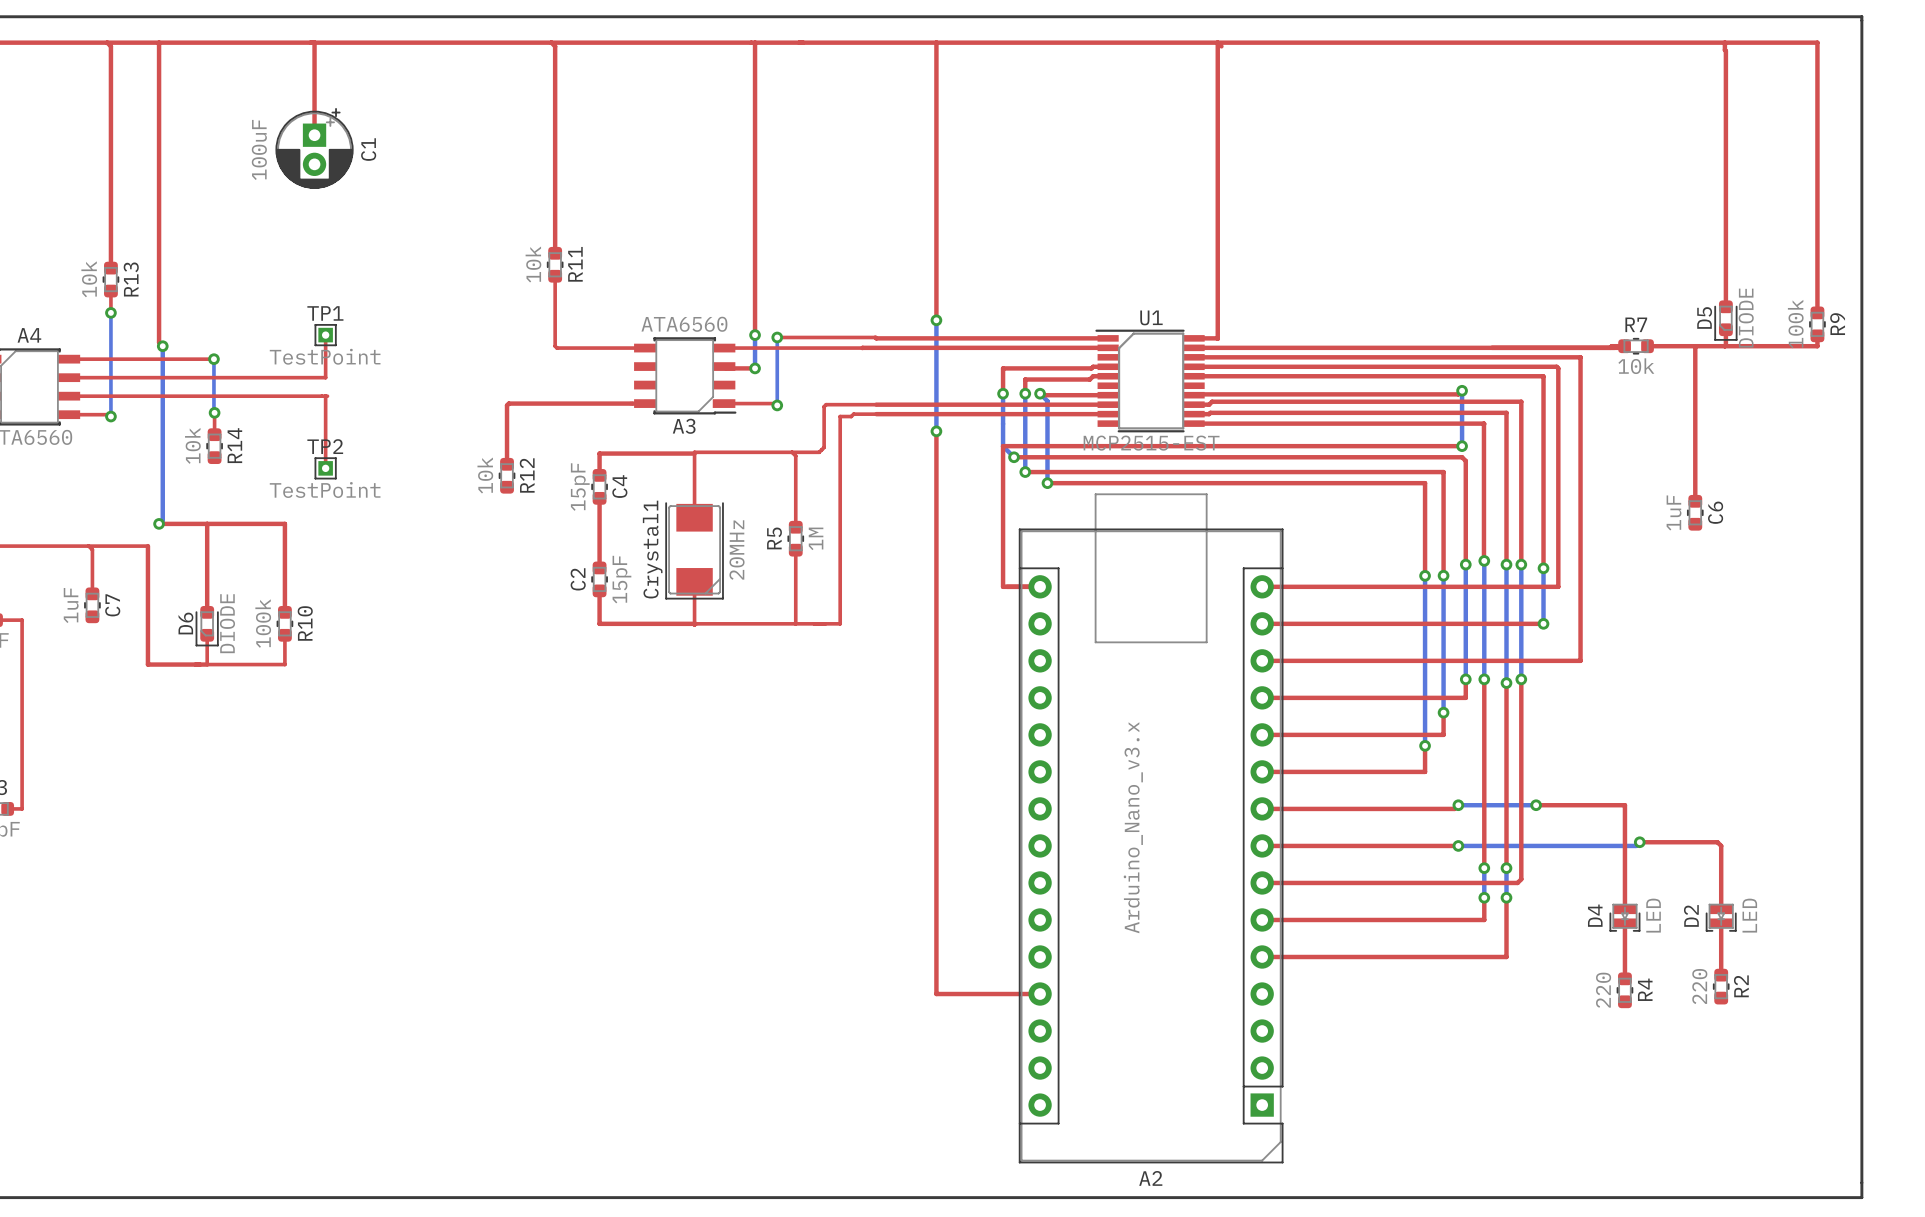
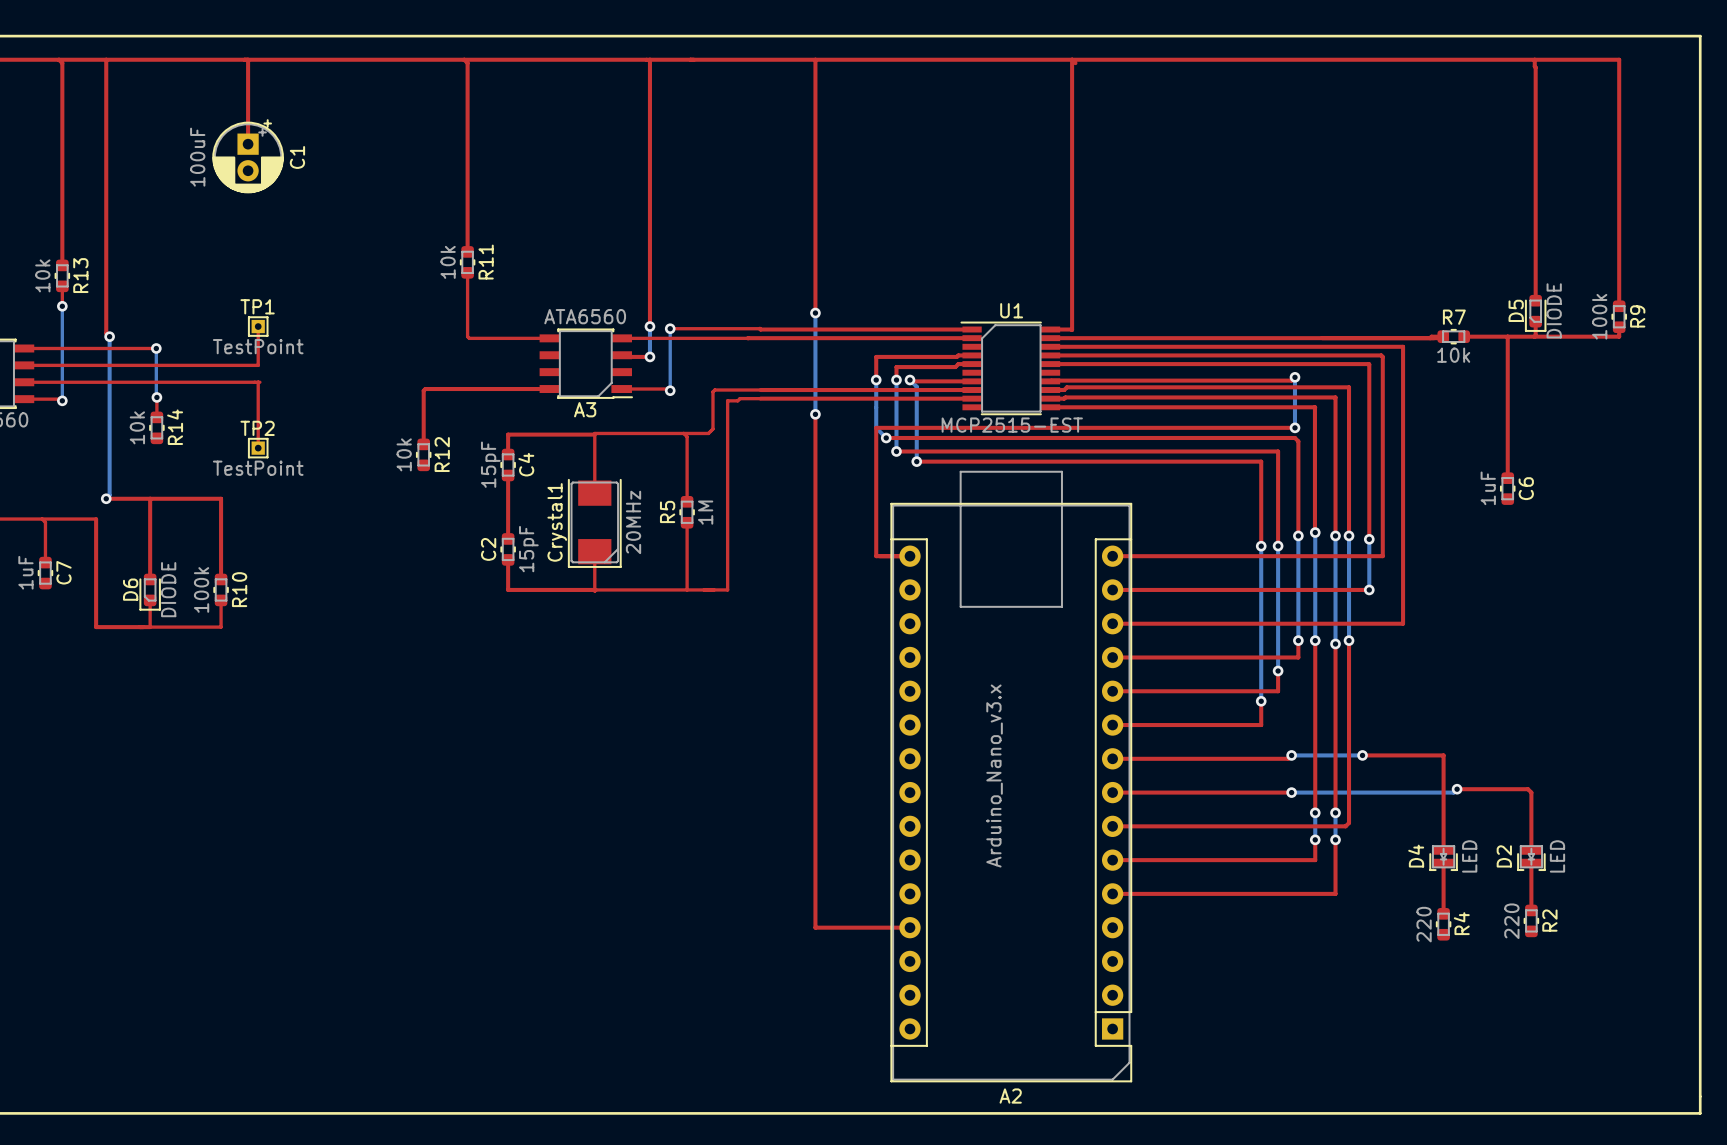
line: (1861, 16) (1861, 1197) -> (1659, 36) (1700, 36) (1700, 1113) (1659, 1113)

